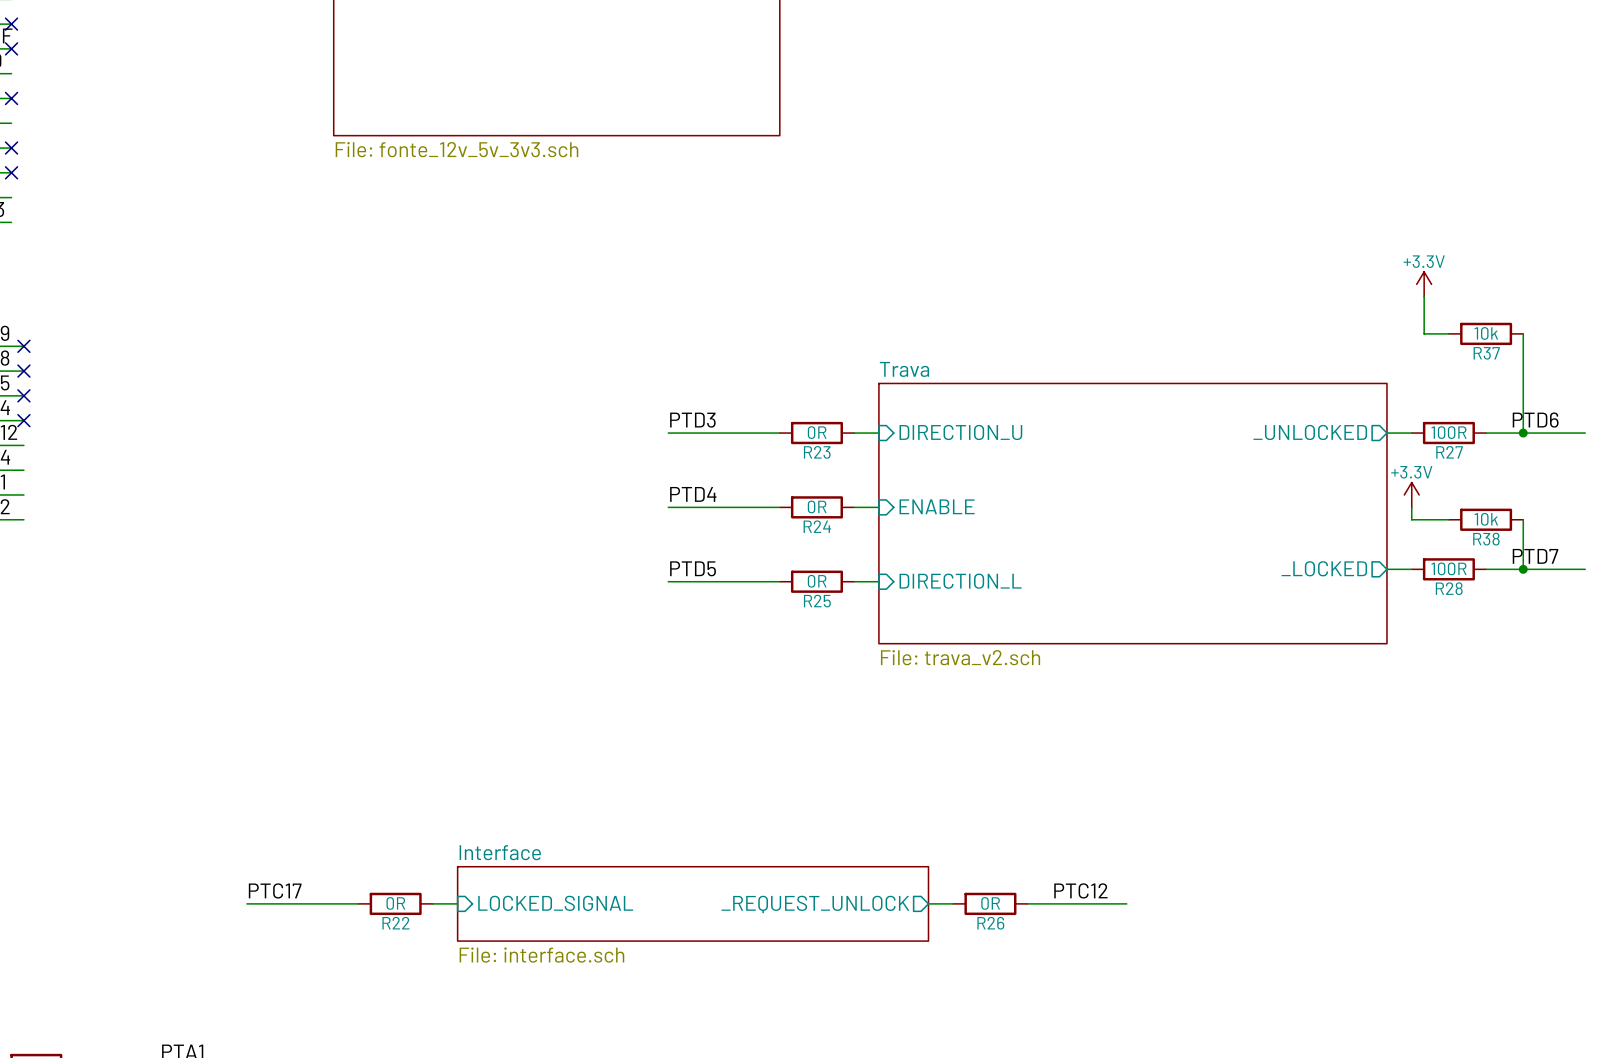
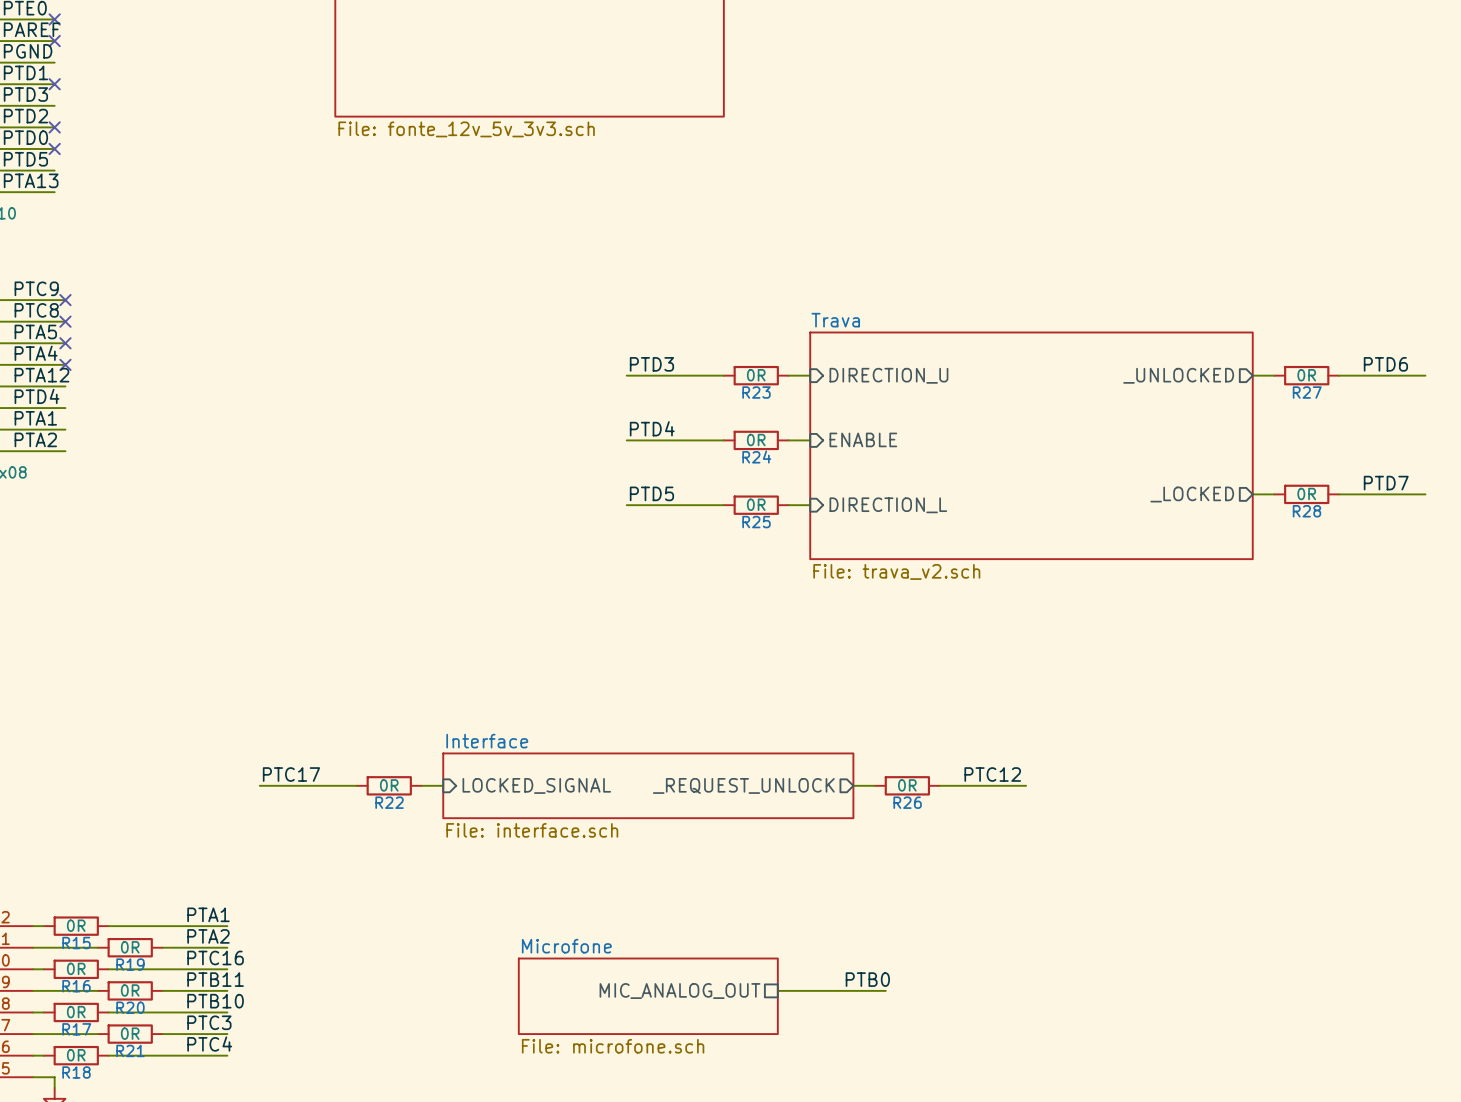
power symbol: +3.3V (1424, 284) -> none
wire: (1424, 296) (1424, 333) (1448, 333) -> none
R37: 10k (1486, 333) -> none
wire: (1523, 333) (1523, 433) -> none
R27 value: 100R (1449, 432) -> 0R (1306, 375)
junction: (1523, 433) -> none
power symbol: +3.3V (1411, 494) -> none
wire: (1411, 507) (1411, 519) (1448, 519) -> none
R38: 10k (1486, 519) -> none
wire: (1523, 519) (1523, 569) -> none
R28 value: 100R (1449, 568) -> 0R (1306, 493)
junction: (1523, 569) -> none

